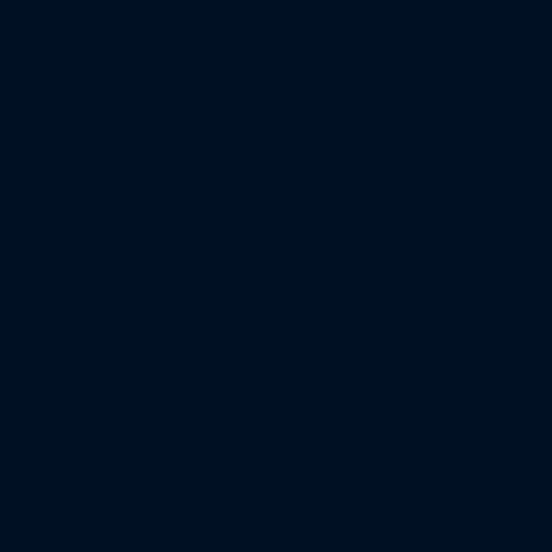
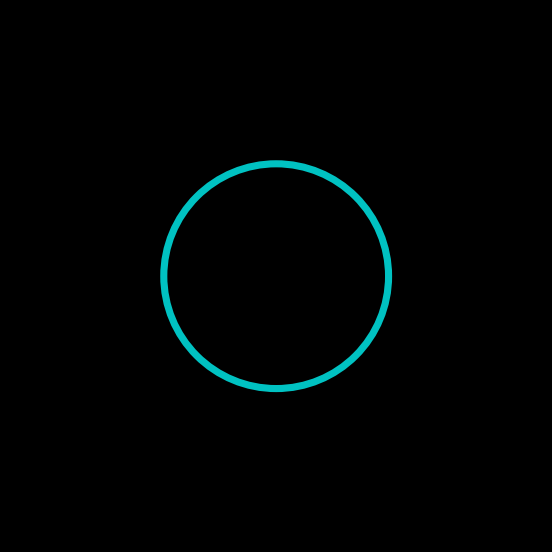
drawing: none -> [160, 160, 393, 393]

